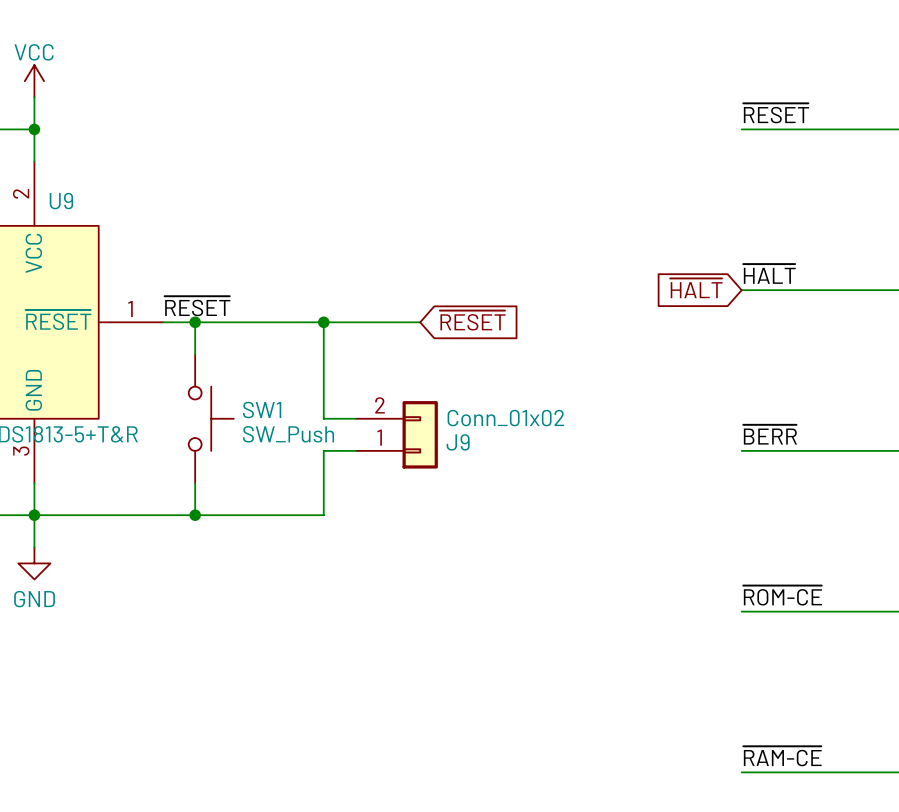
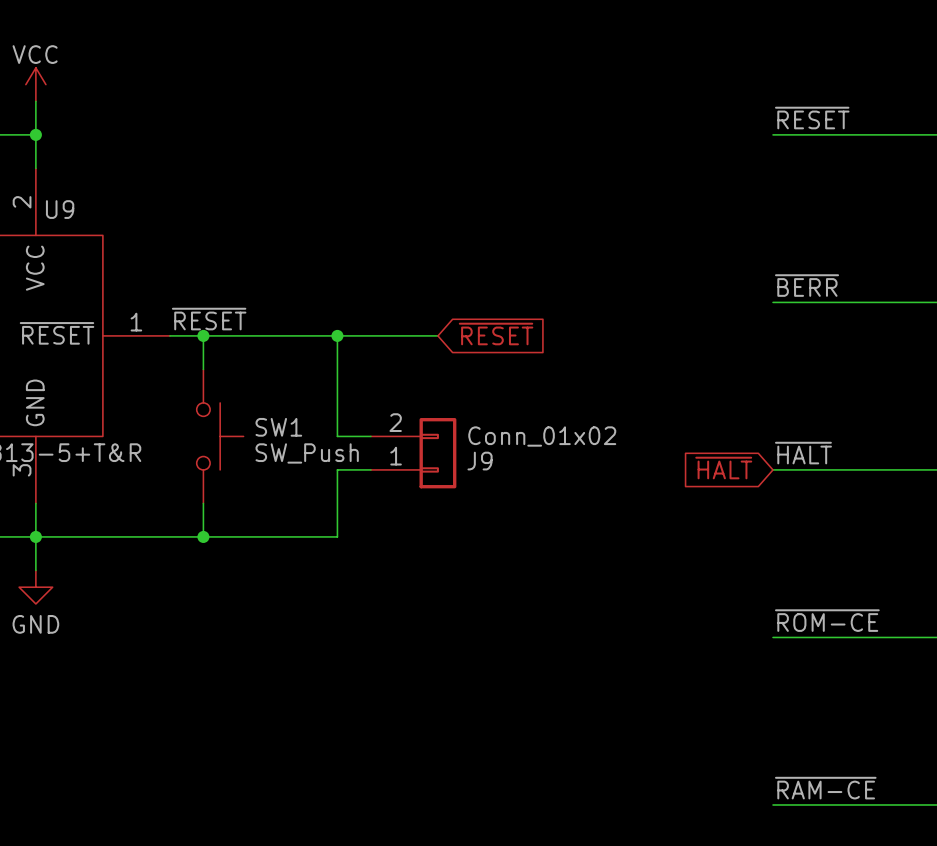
label: ~{HALT} (769, 273) -> ~{BERR} (807, 285)
global label position: ~{HALT} (696, 288) -> ~{HALT} (723, 468)
label: ~{BERR} (770, 434) -> ~{HALT} (803, 453)

